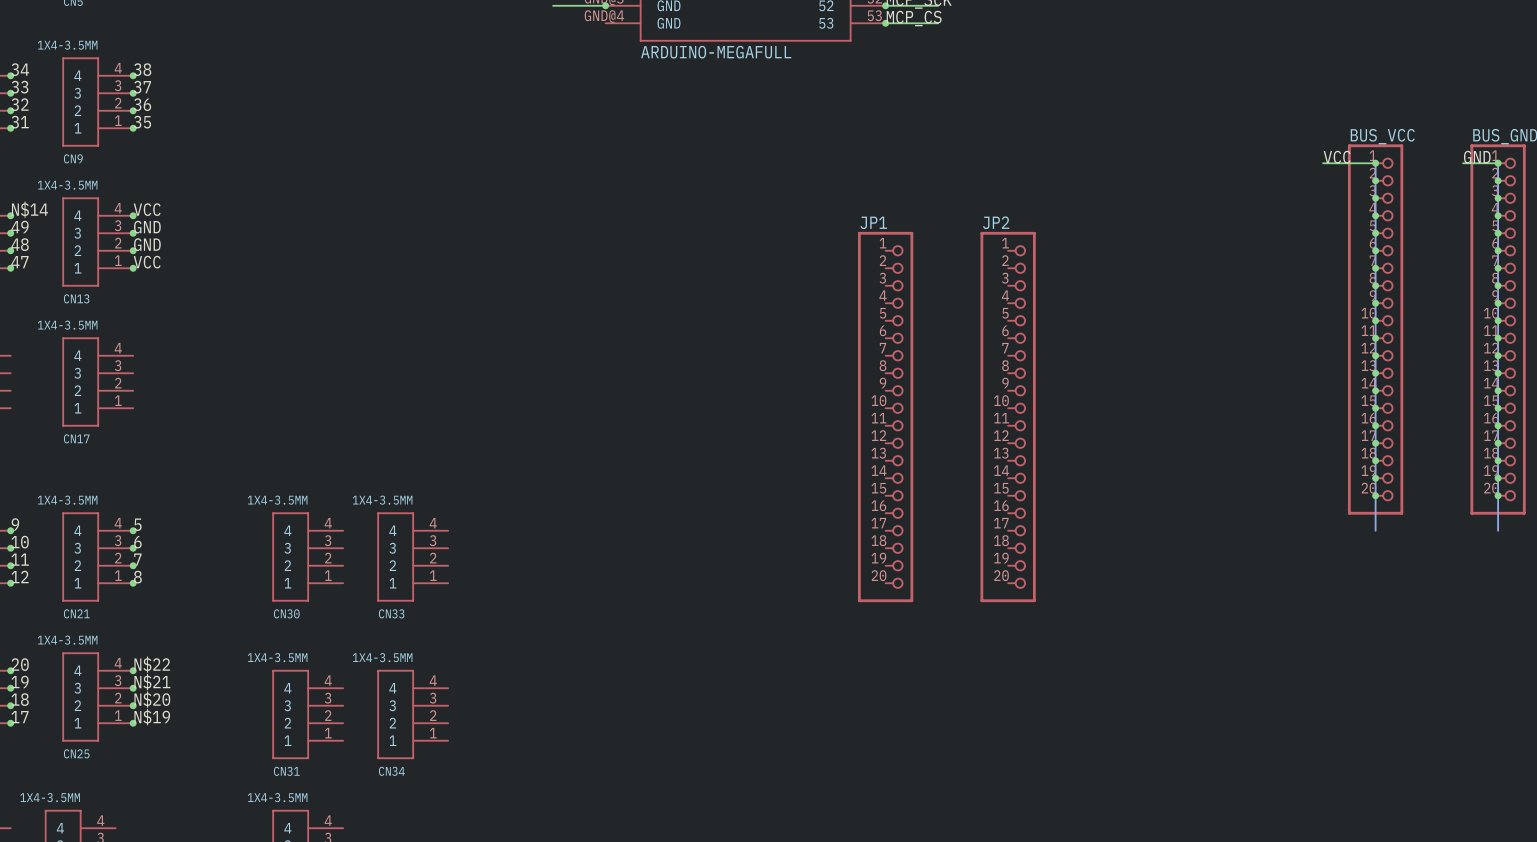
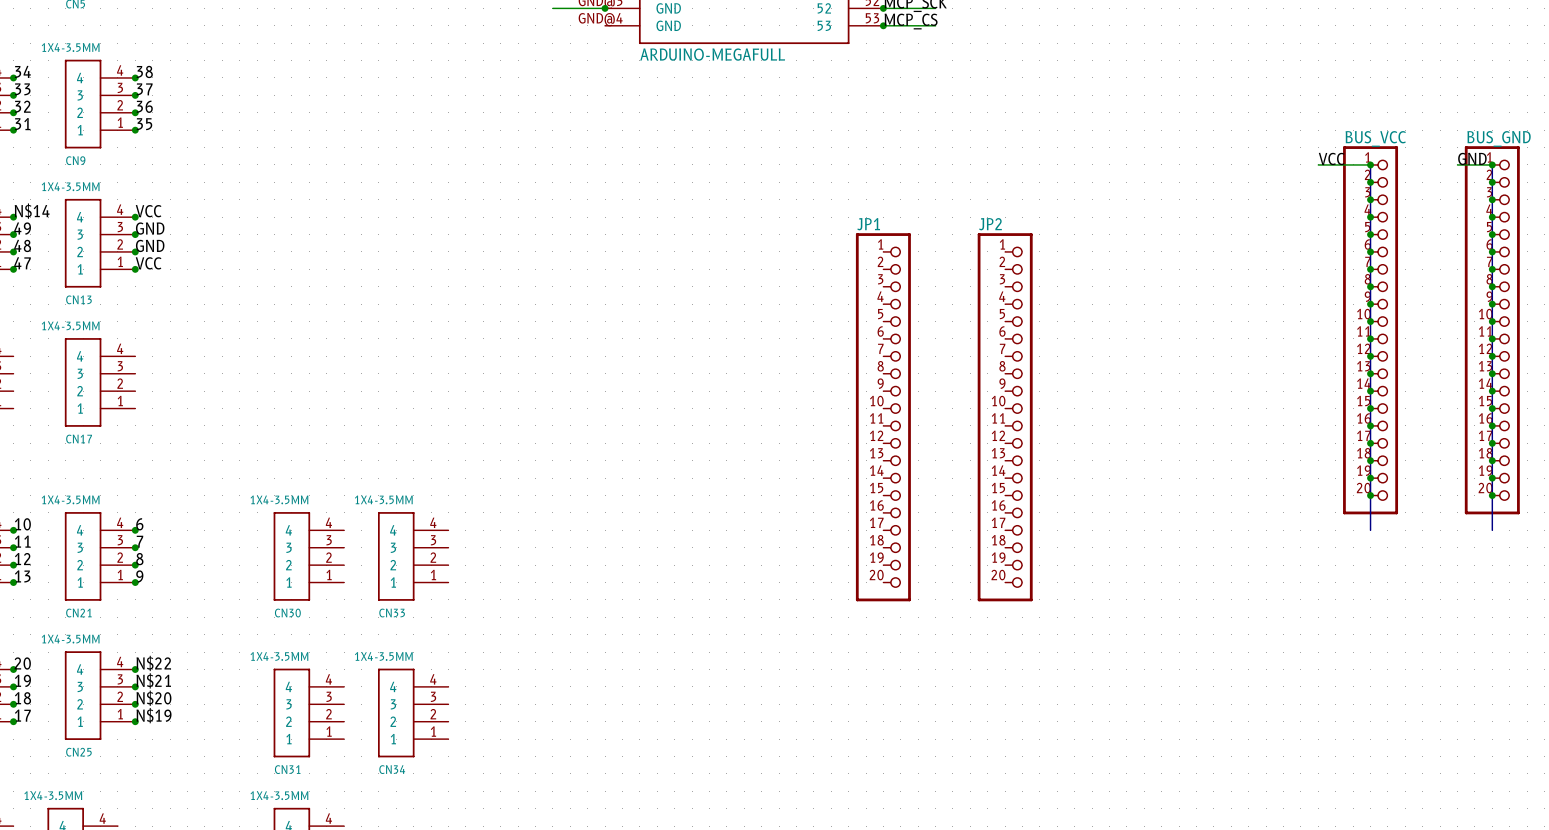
label: 9 (15, 524) -> 10 (22, 524)
label: 5 (137, 524) -> 6 (139, 524)
label: 10 (20, 542) -> 11 (22, 541)
label: 6 (137, 542) -> 7 (139, 541)
label: 11 (20, 559) -> 12 (22, 559)
label: 7 (137, 559) -> 8 (139, 559)
label: 12 (20, 577) -> 13 (22, 576)
label: 8 (137, 577) -> 9 (139, 576)

